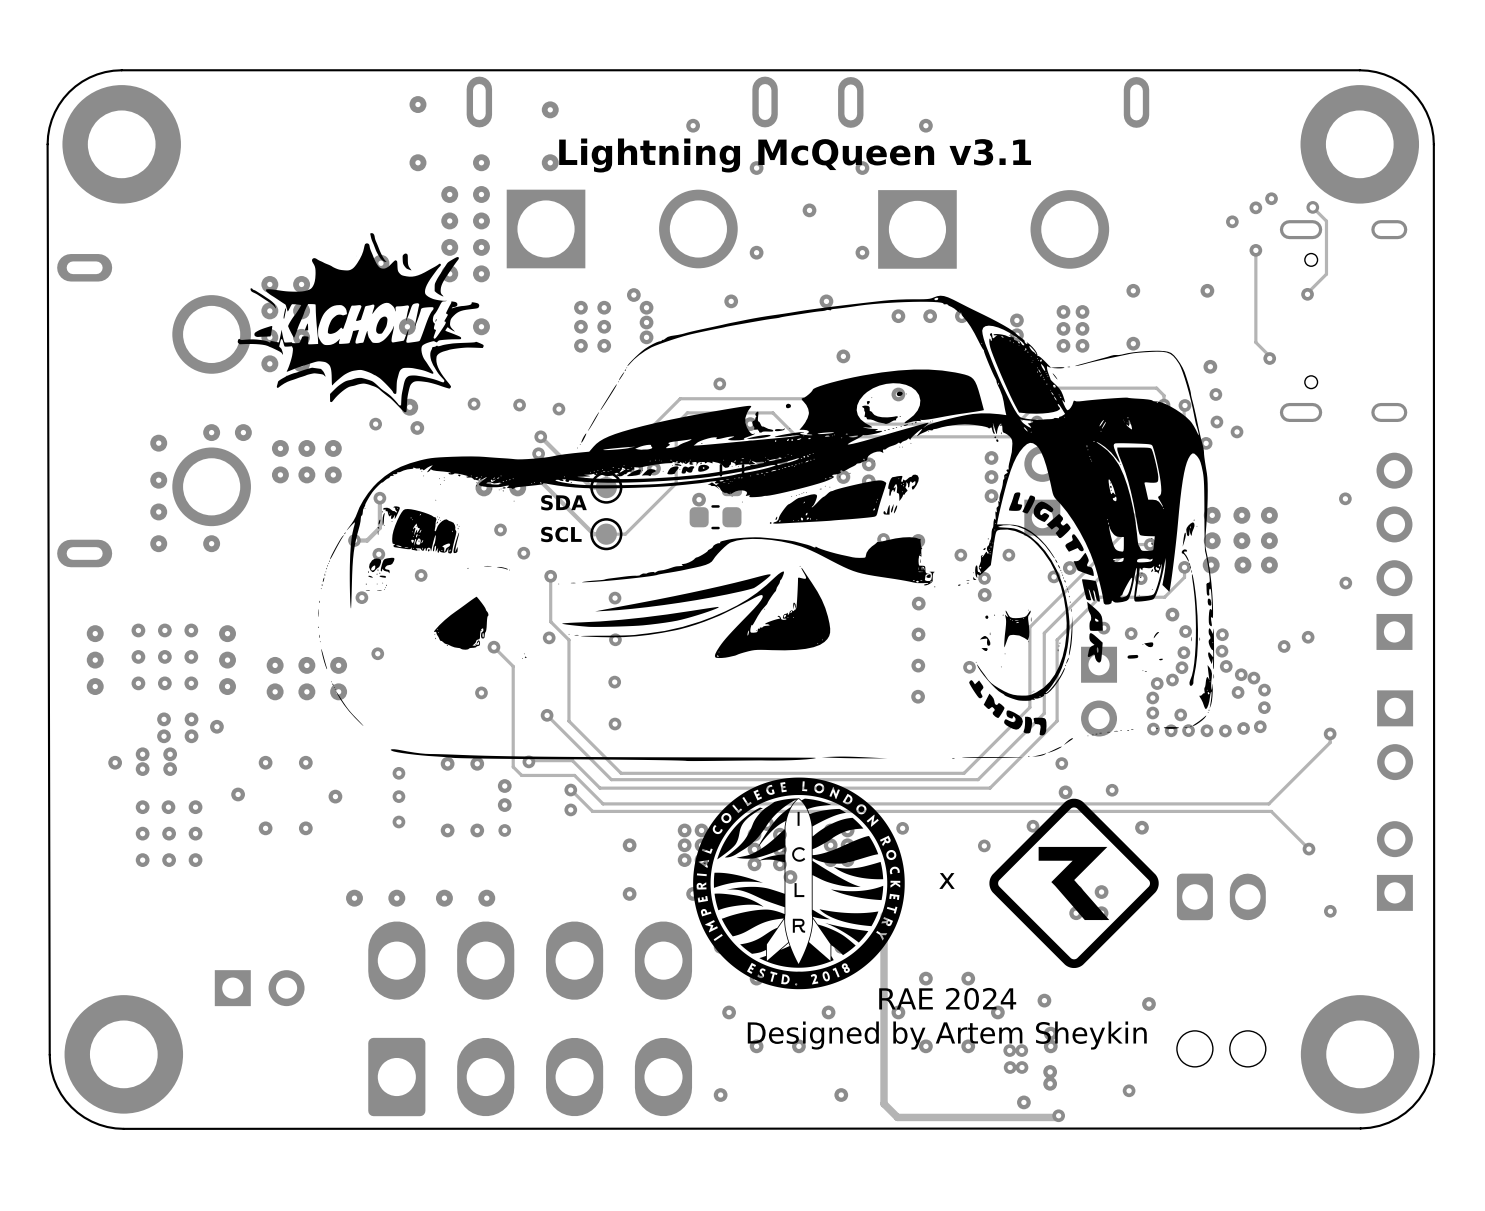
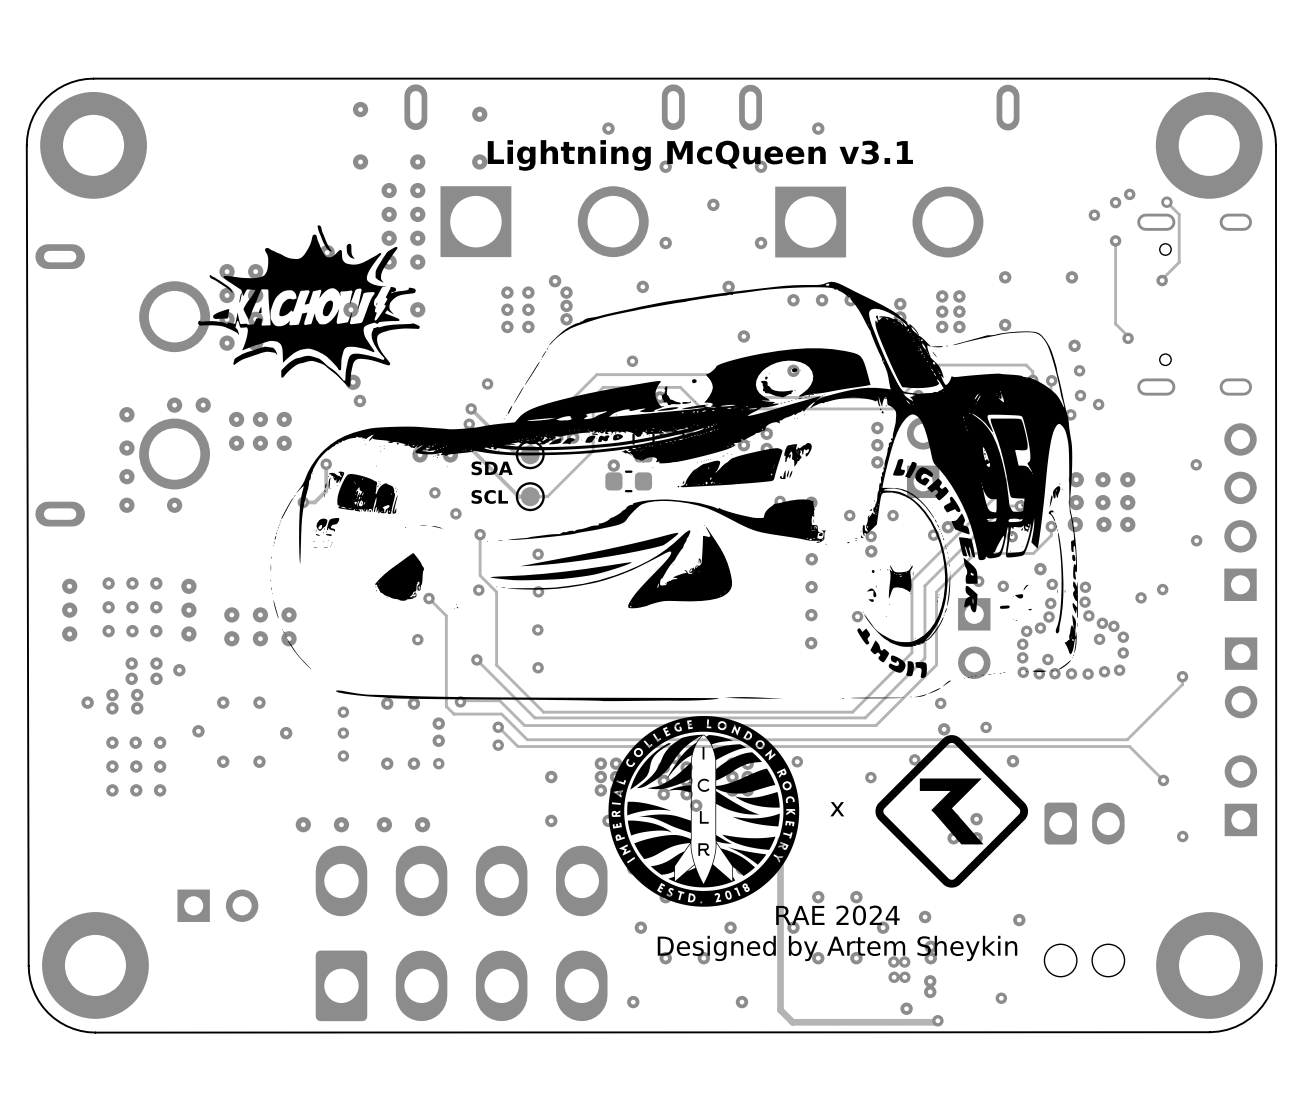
via: (474, 404) -> none
via: (519, 405) -> none
via: (375, 424) -> none
via: (378, 554) -> none
via: (421, 575) -> none
via: (361, 597) -> none
via: (377, 653) -> none

